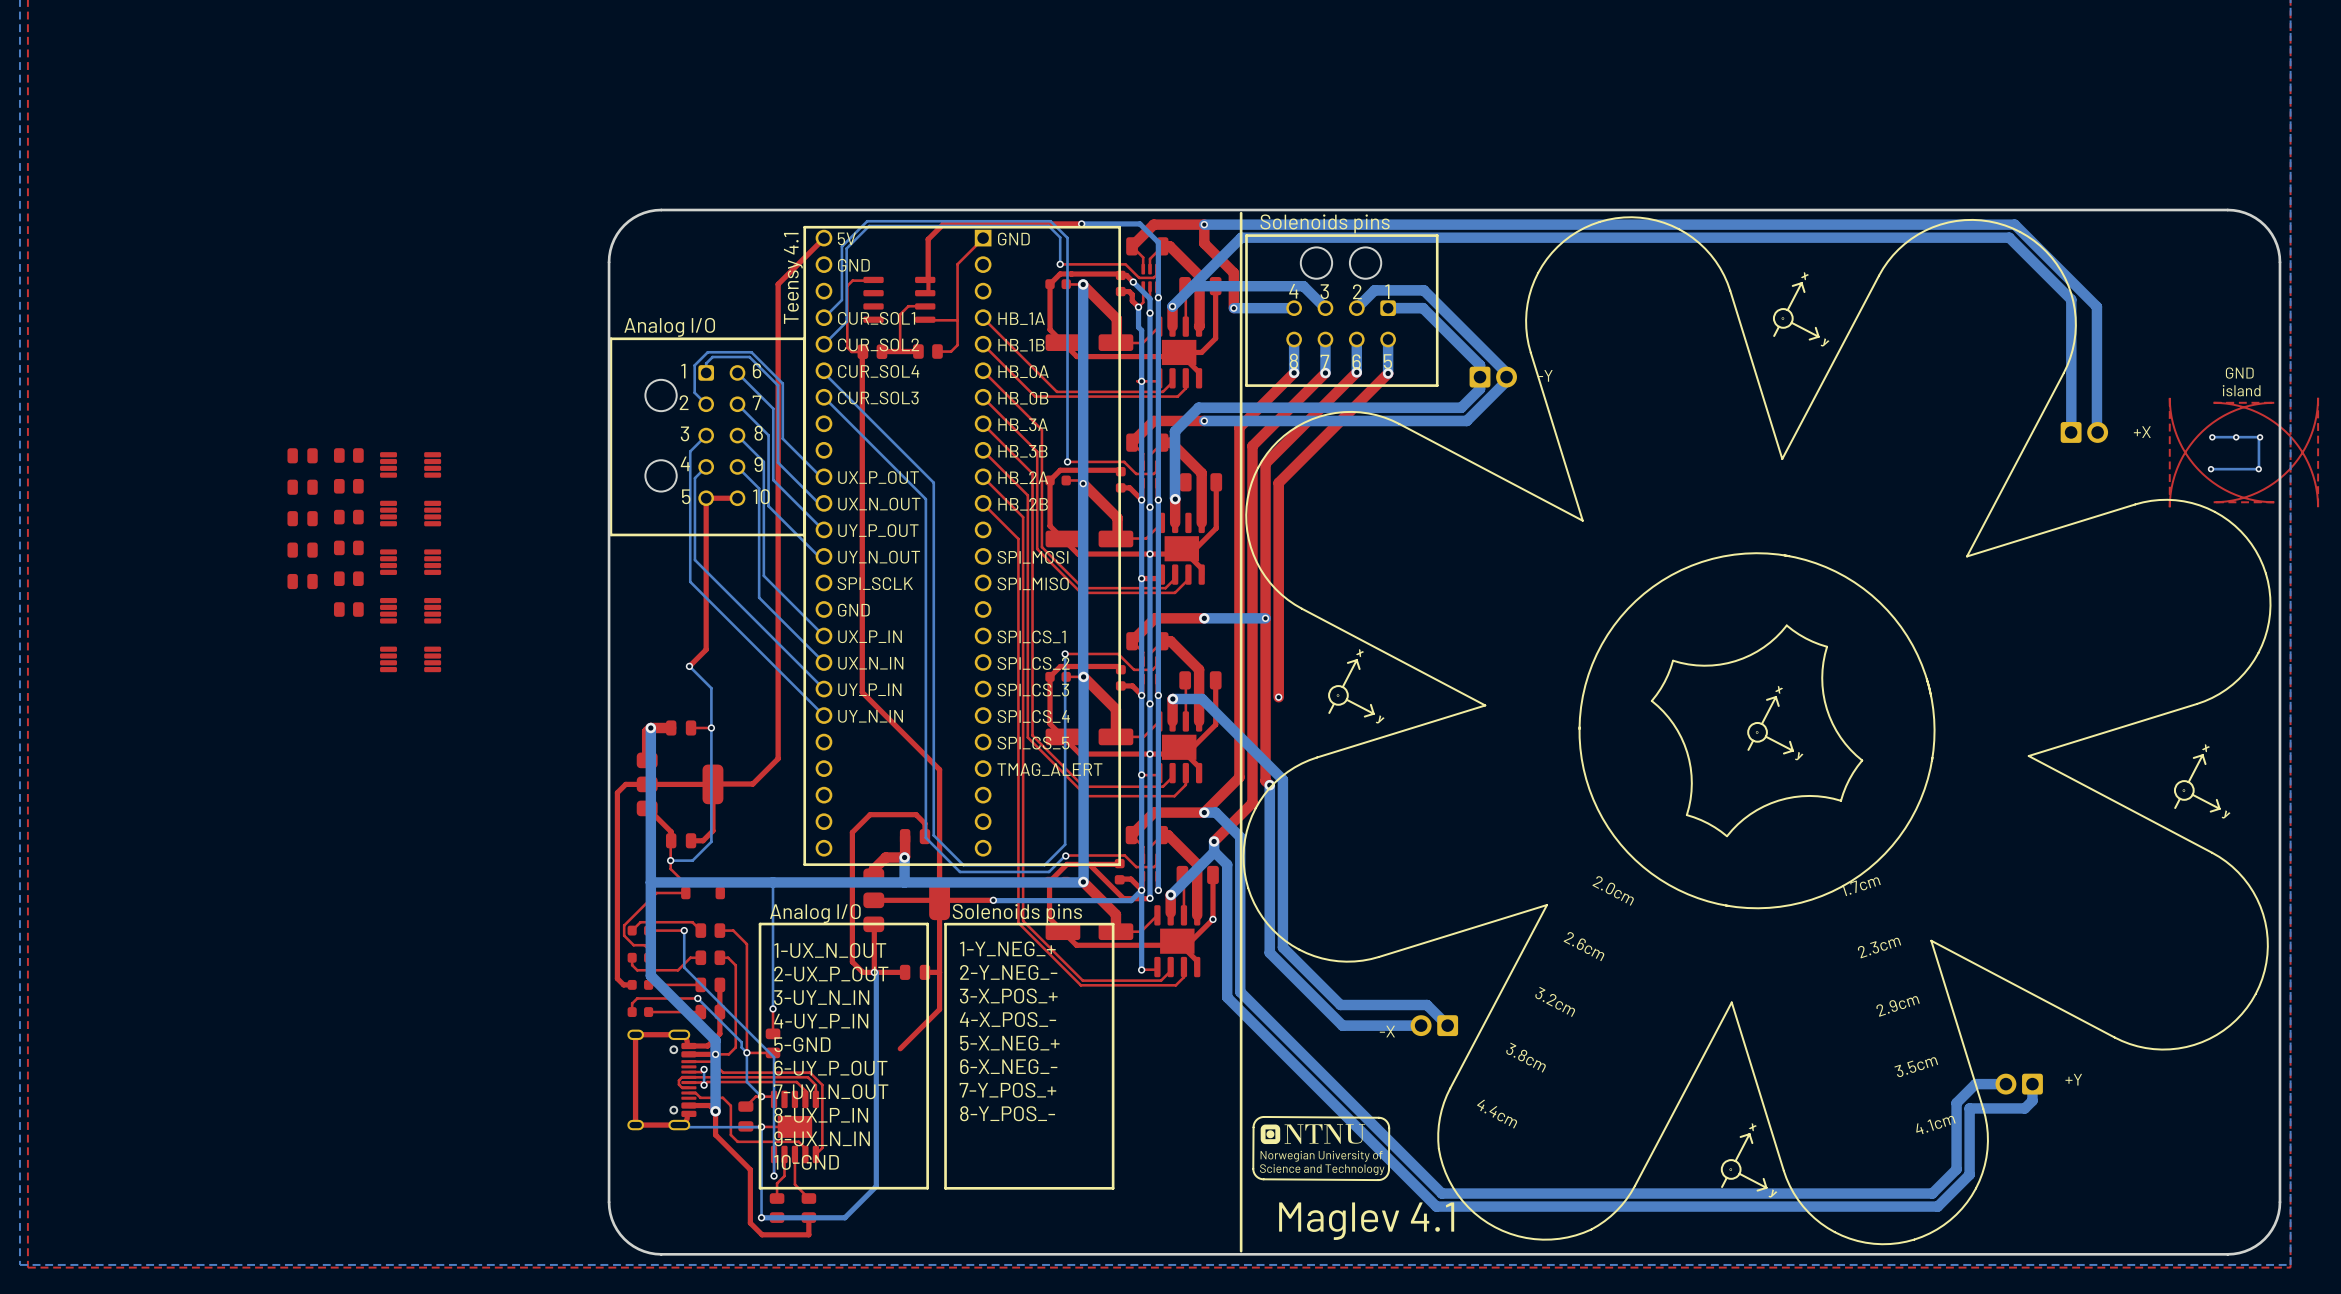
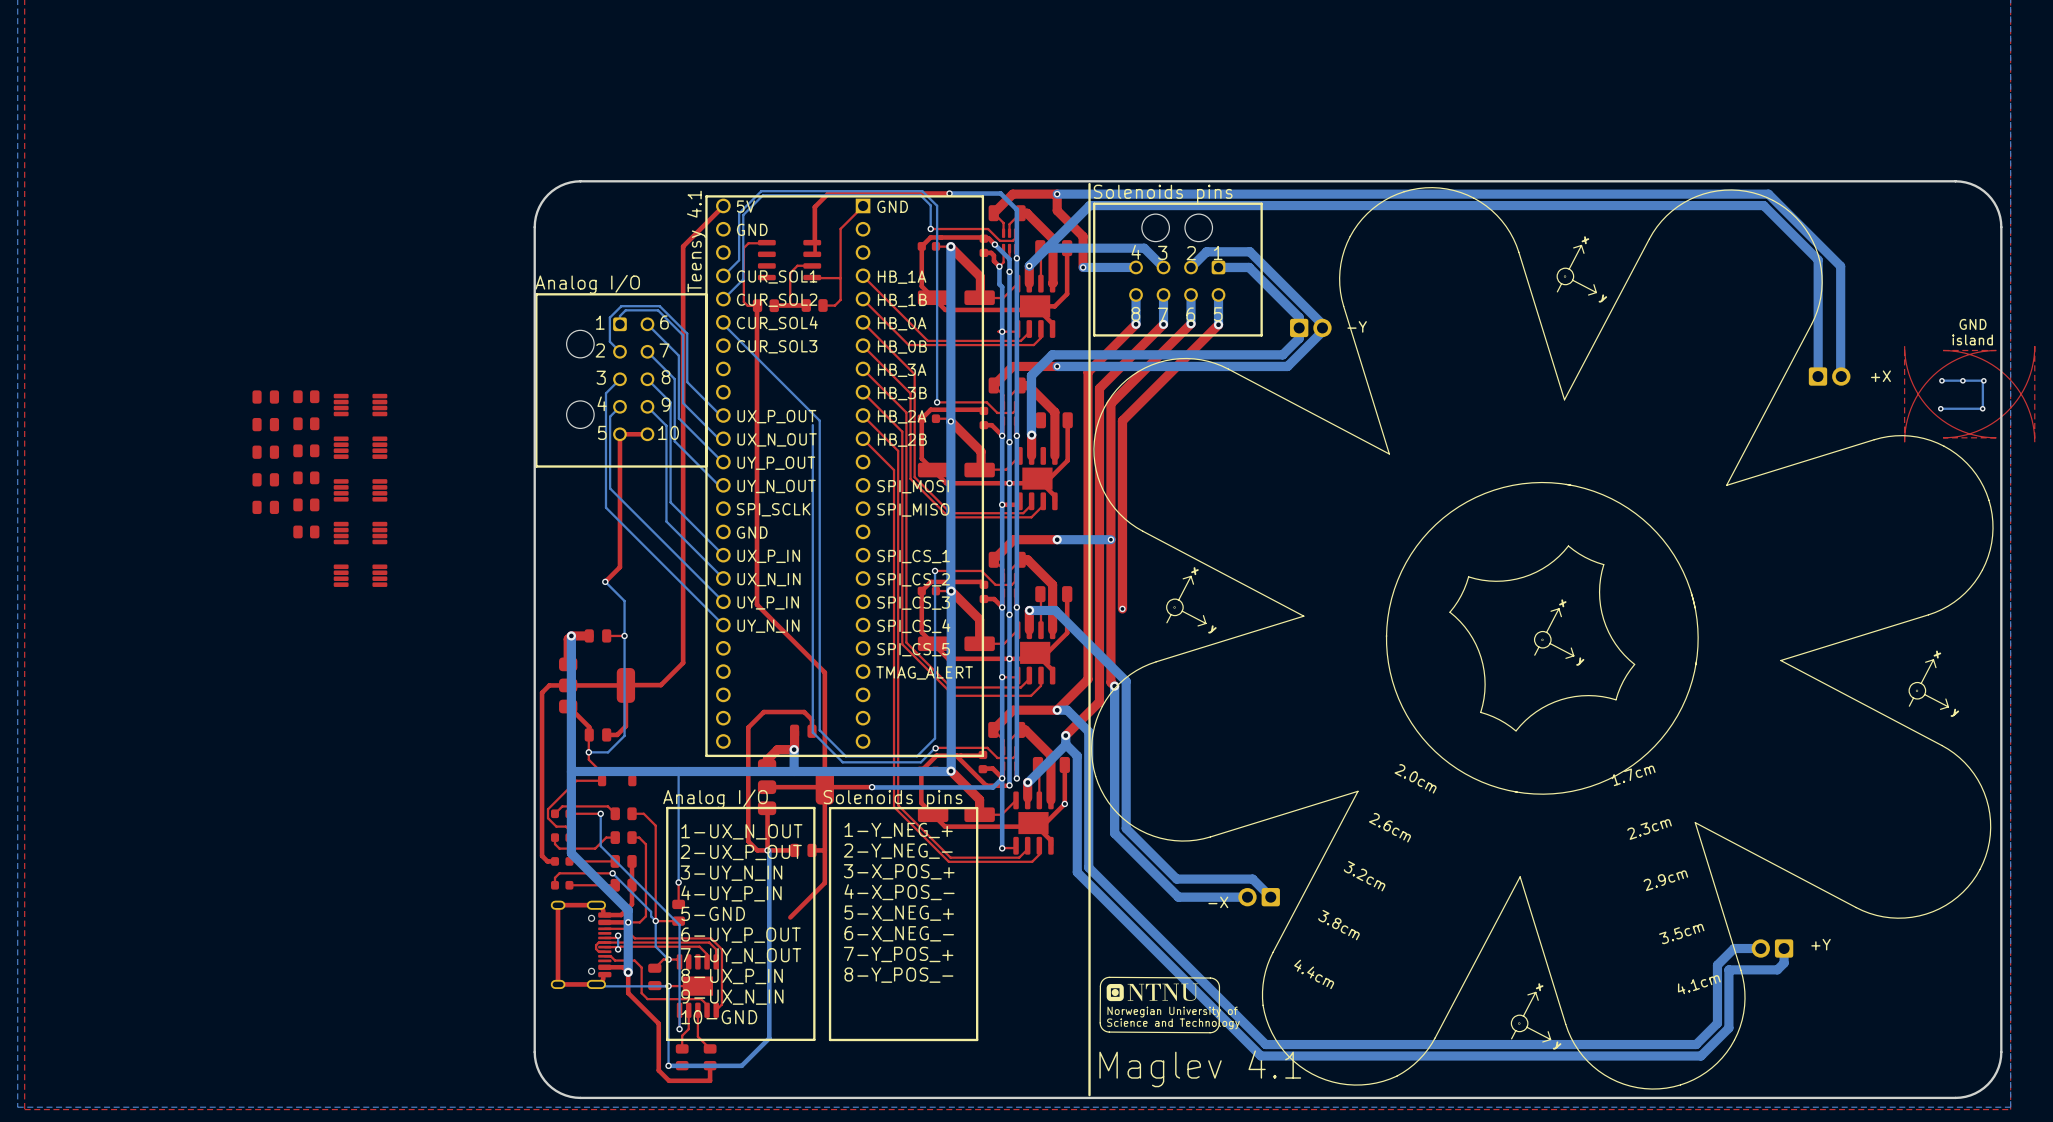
bottom track: (823, 397) (925, 499) -> (812, 425) (812, 435)

